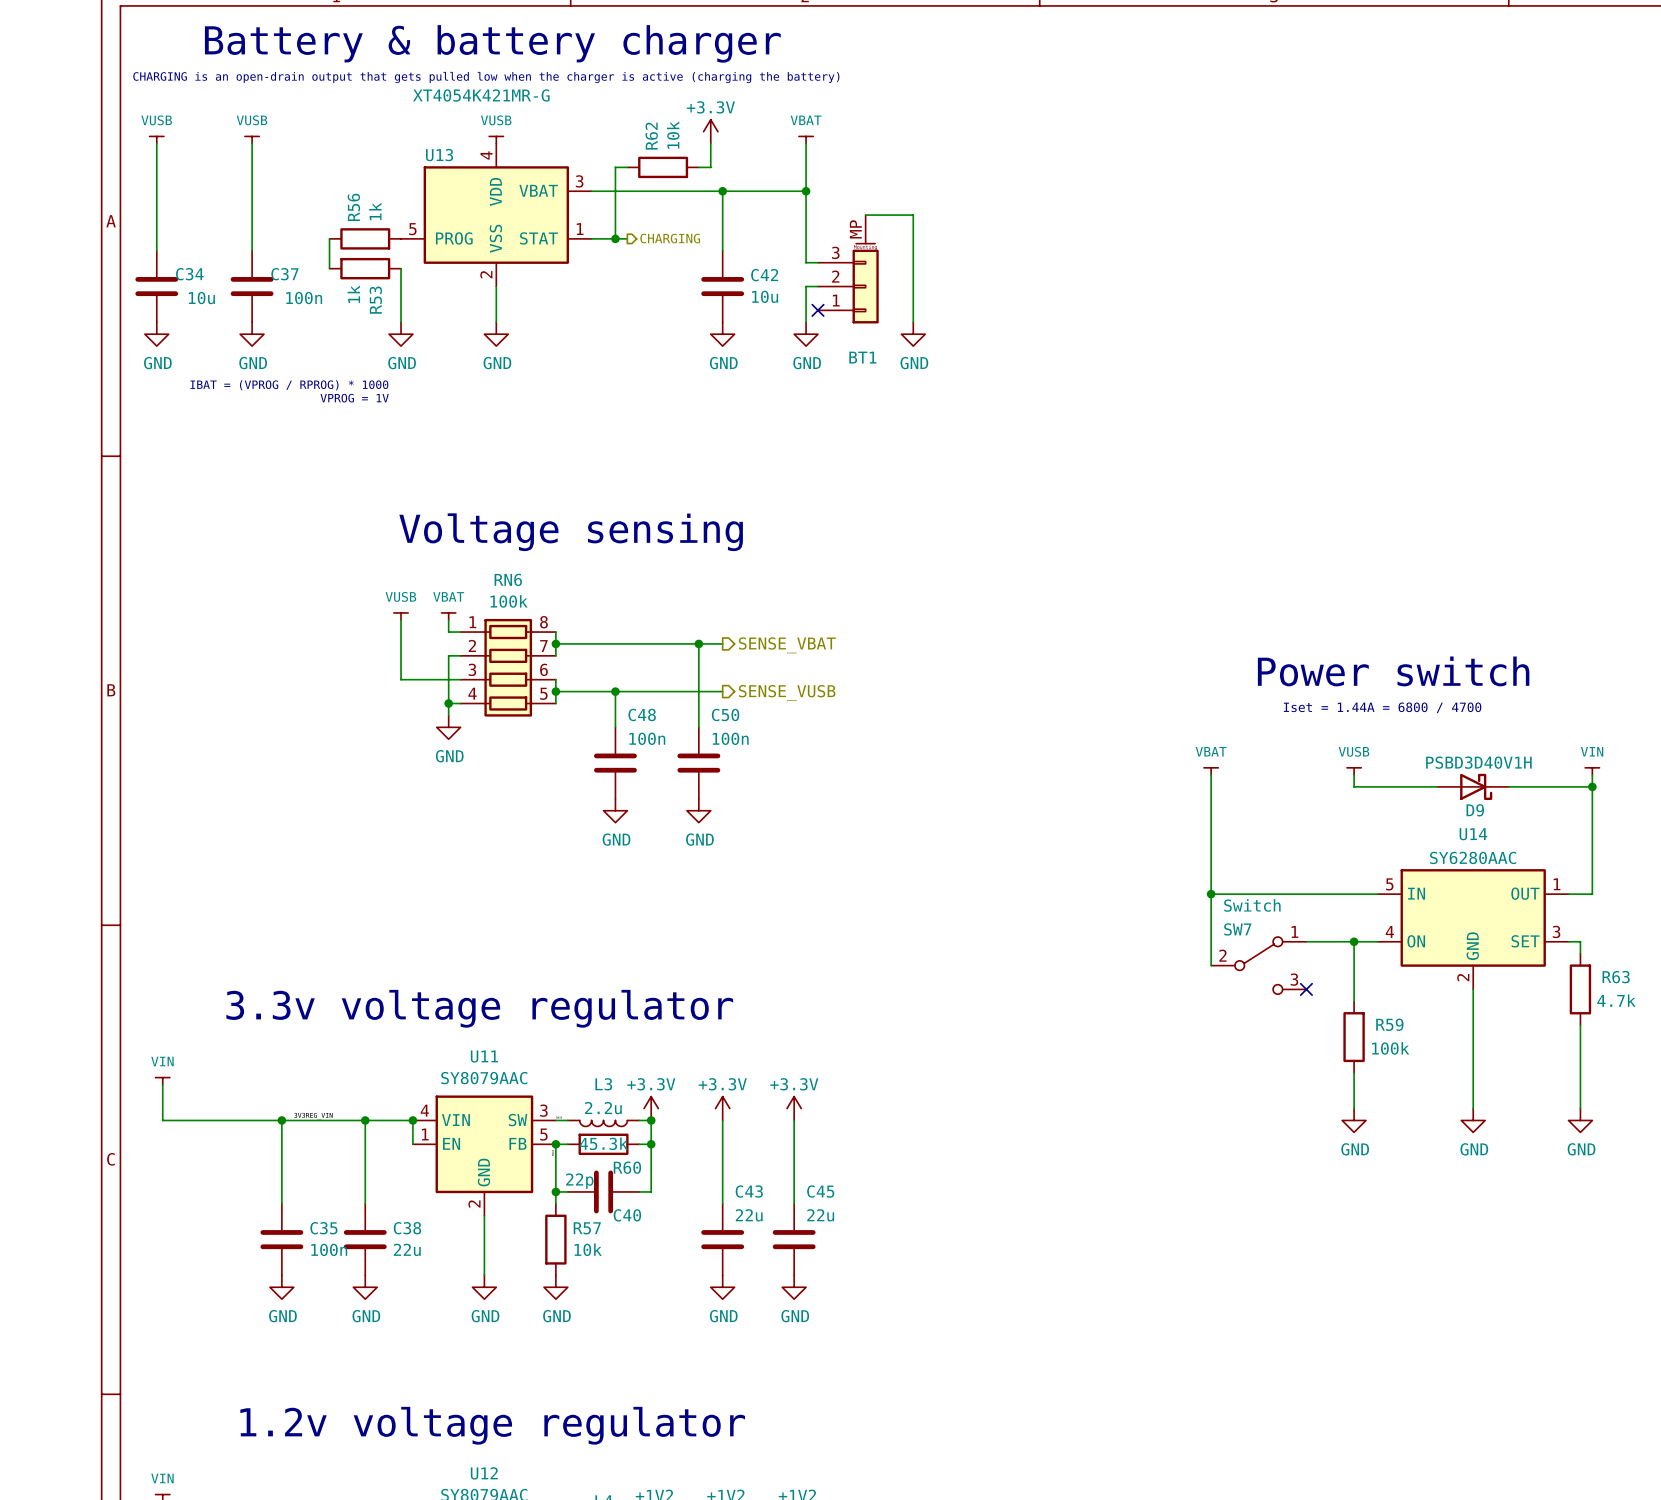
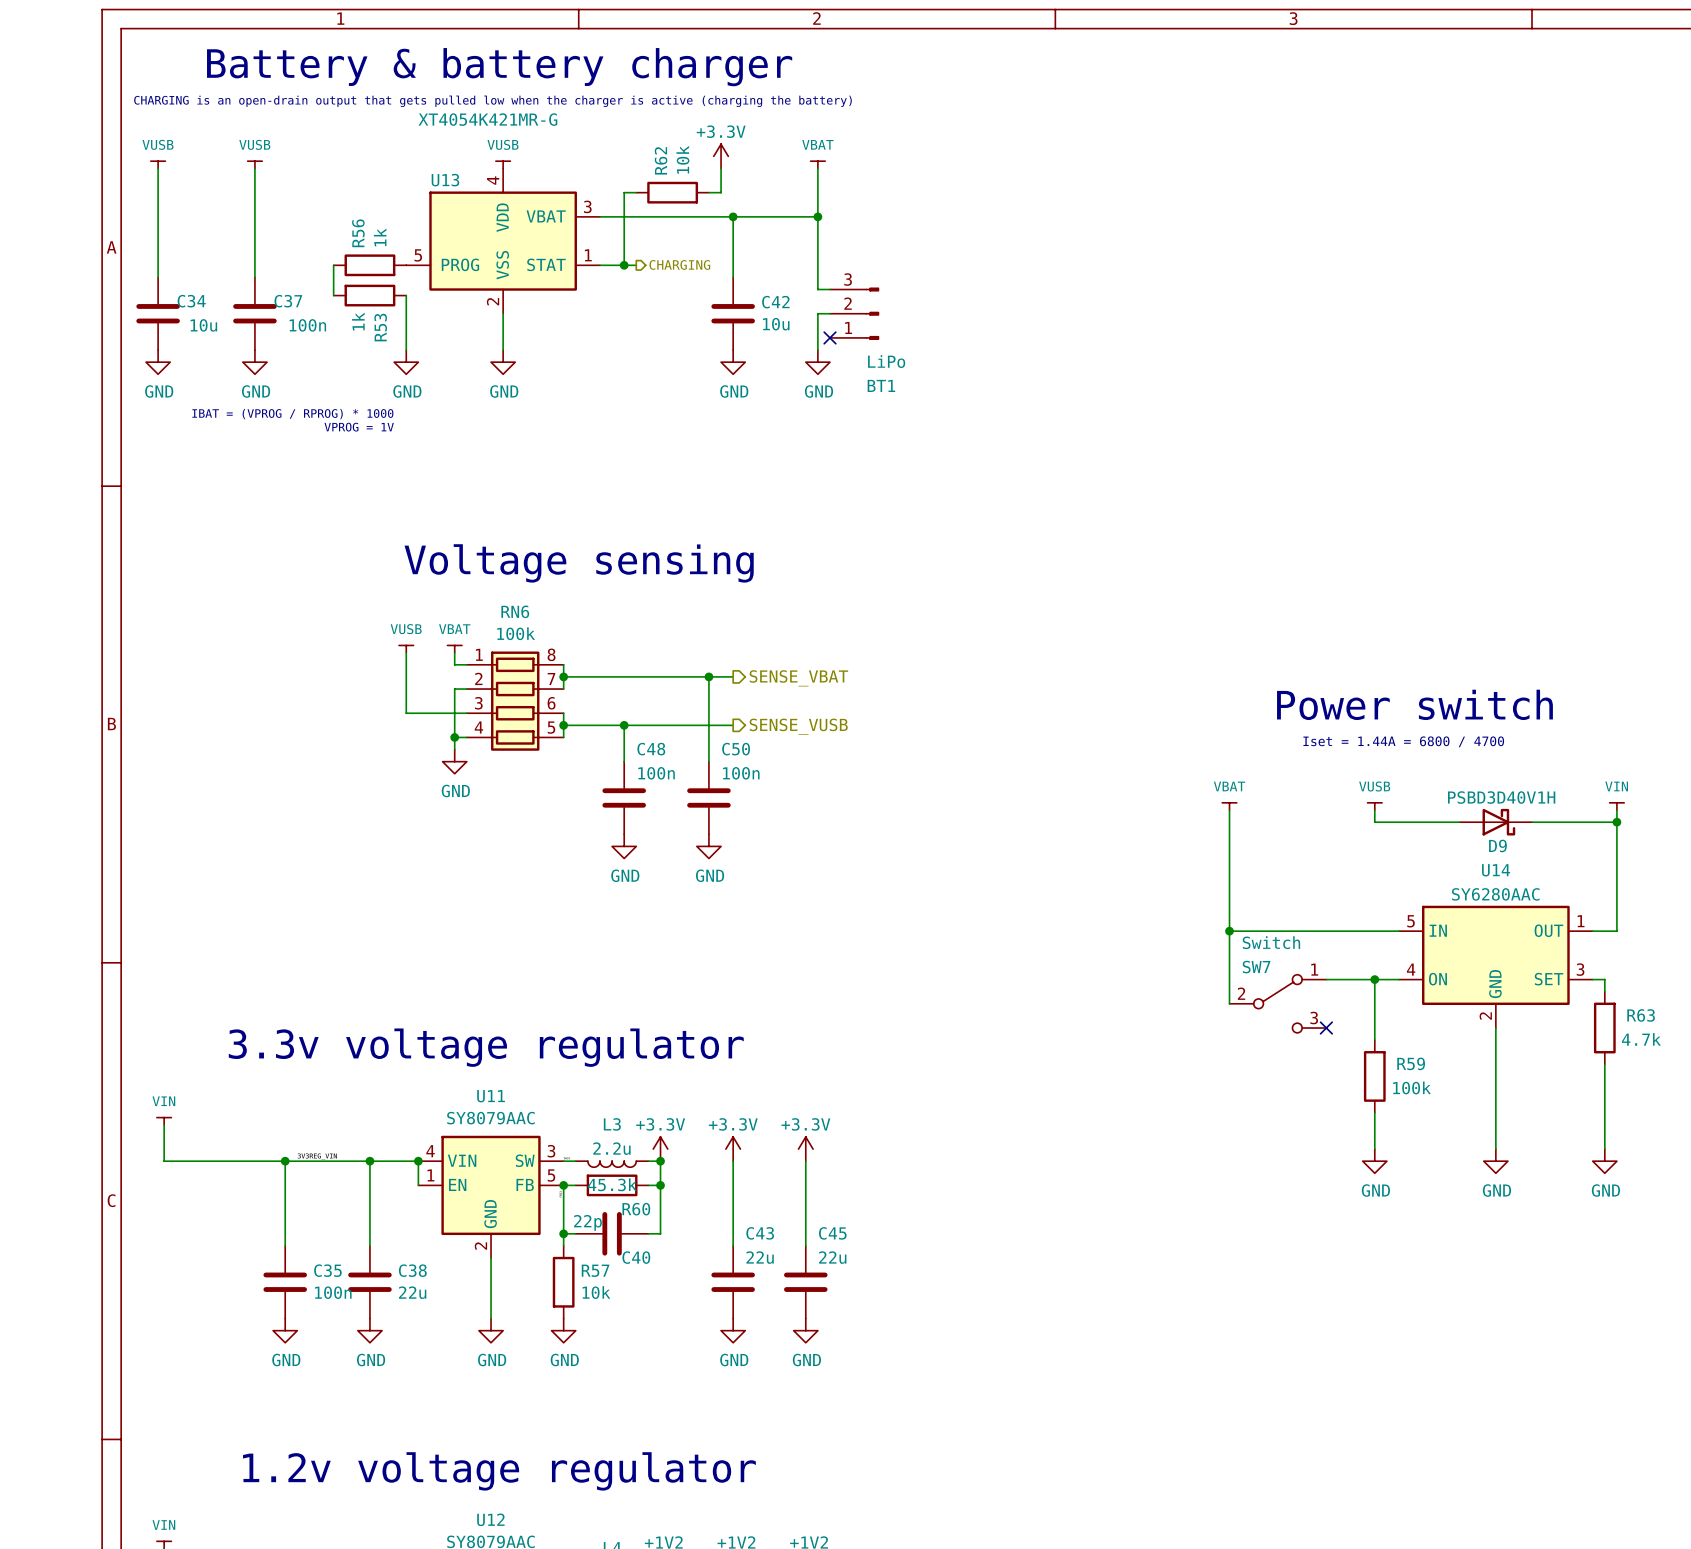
BT1 symbol: [817, 215, 879, 324] -> [830, 287, 880, 340]
wire: (865, 215) (913, 215) (913, 322) -> none
BT1 value: none -> LiPo (886, 361)
power symbol: GND (913, 334) -> none
BT1 name position: BT1 (862, 357) -> BT1 (881, 385)

